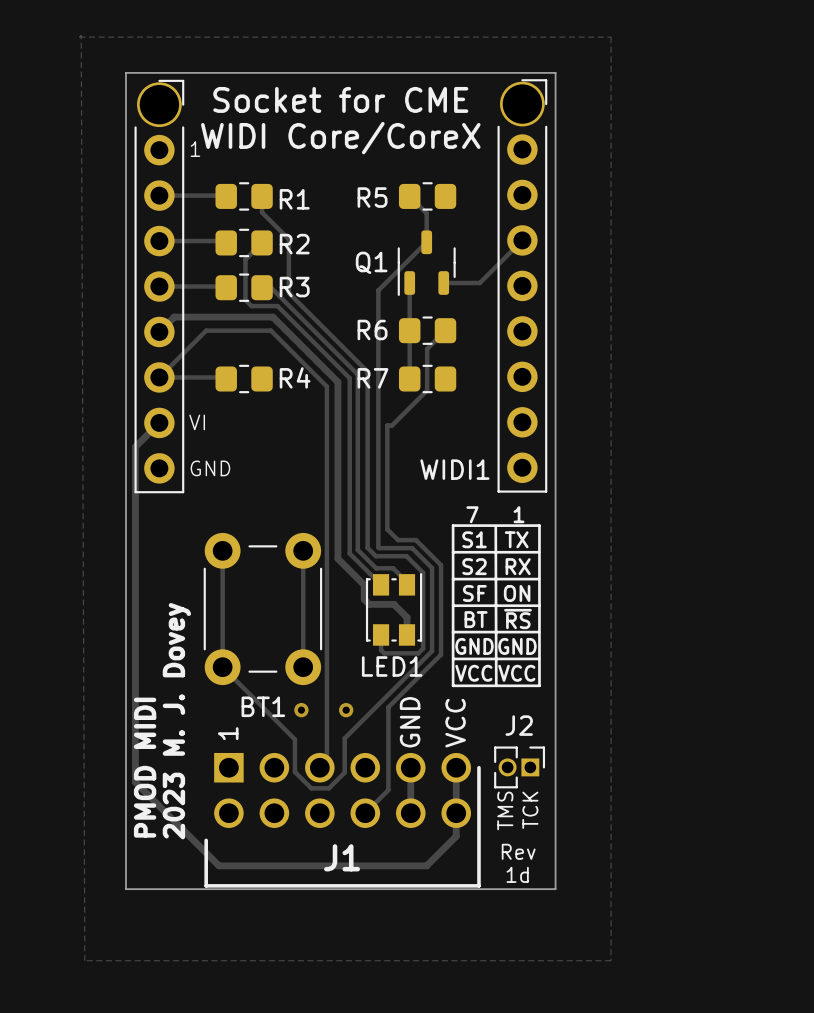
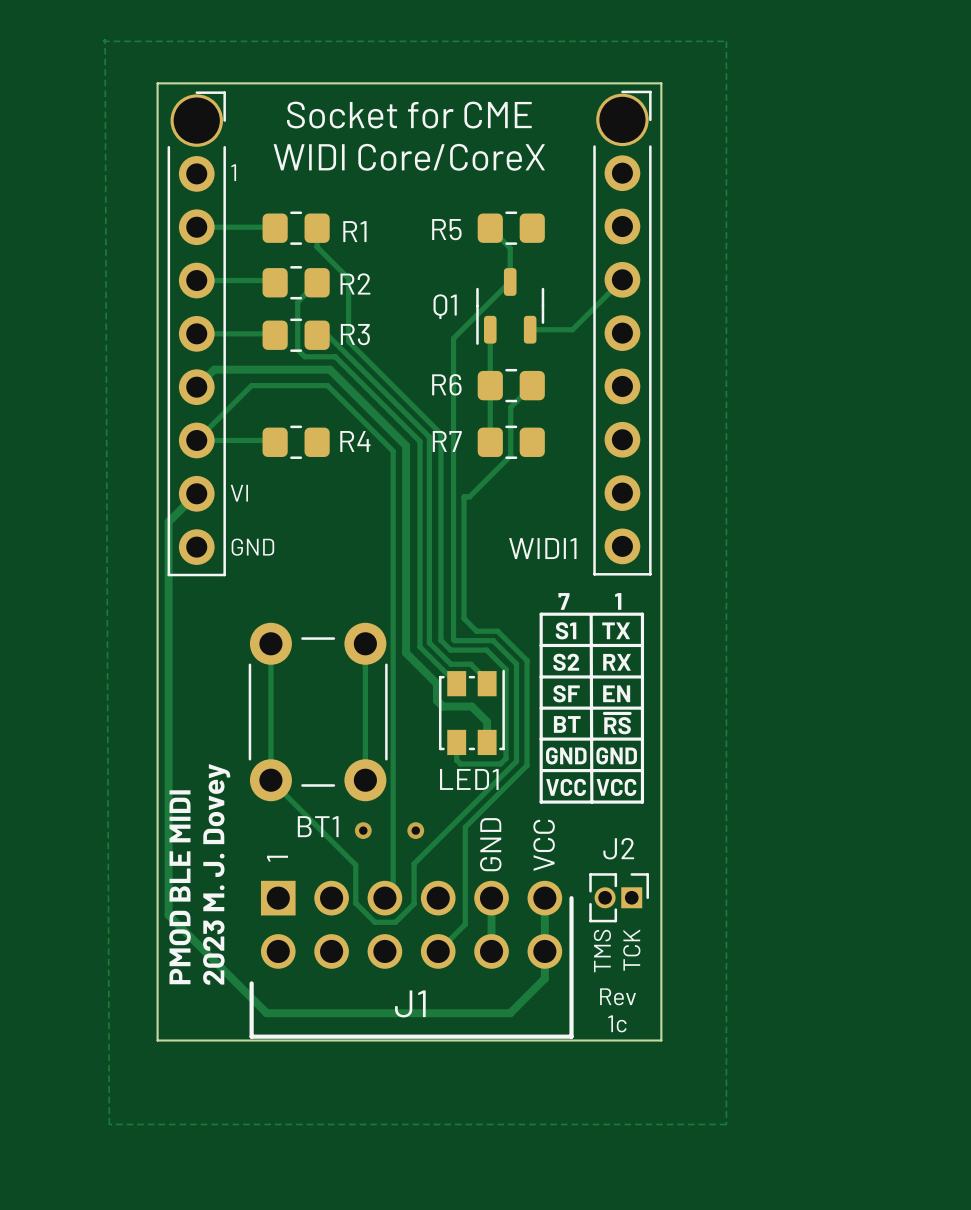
text: ON (517, 593) -> EN (616, 693)
text: PMOD MIDI (145, 767) -> PMOD BLE MIDI (180, 887)
text: 1d (517, 874) -> 1c (617, 1023)

